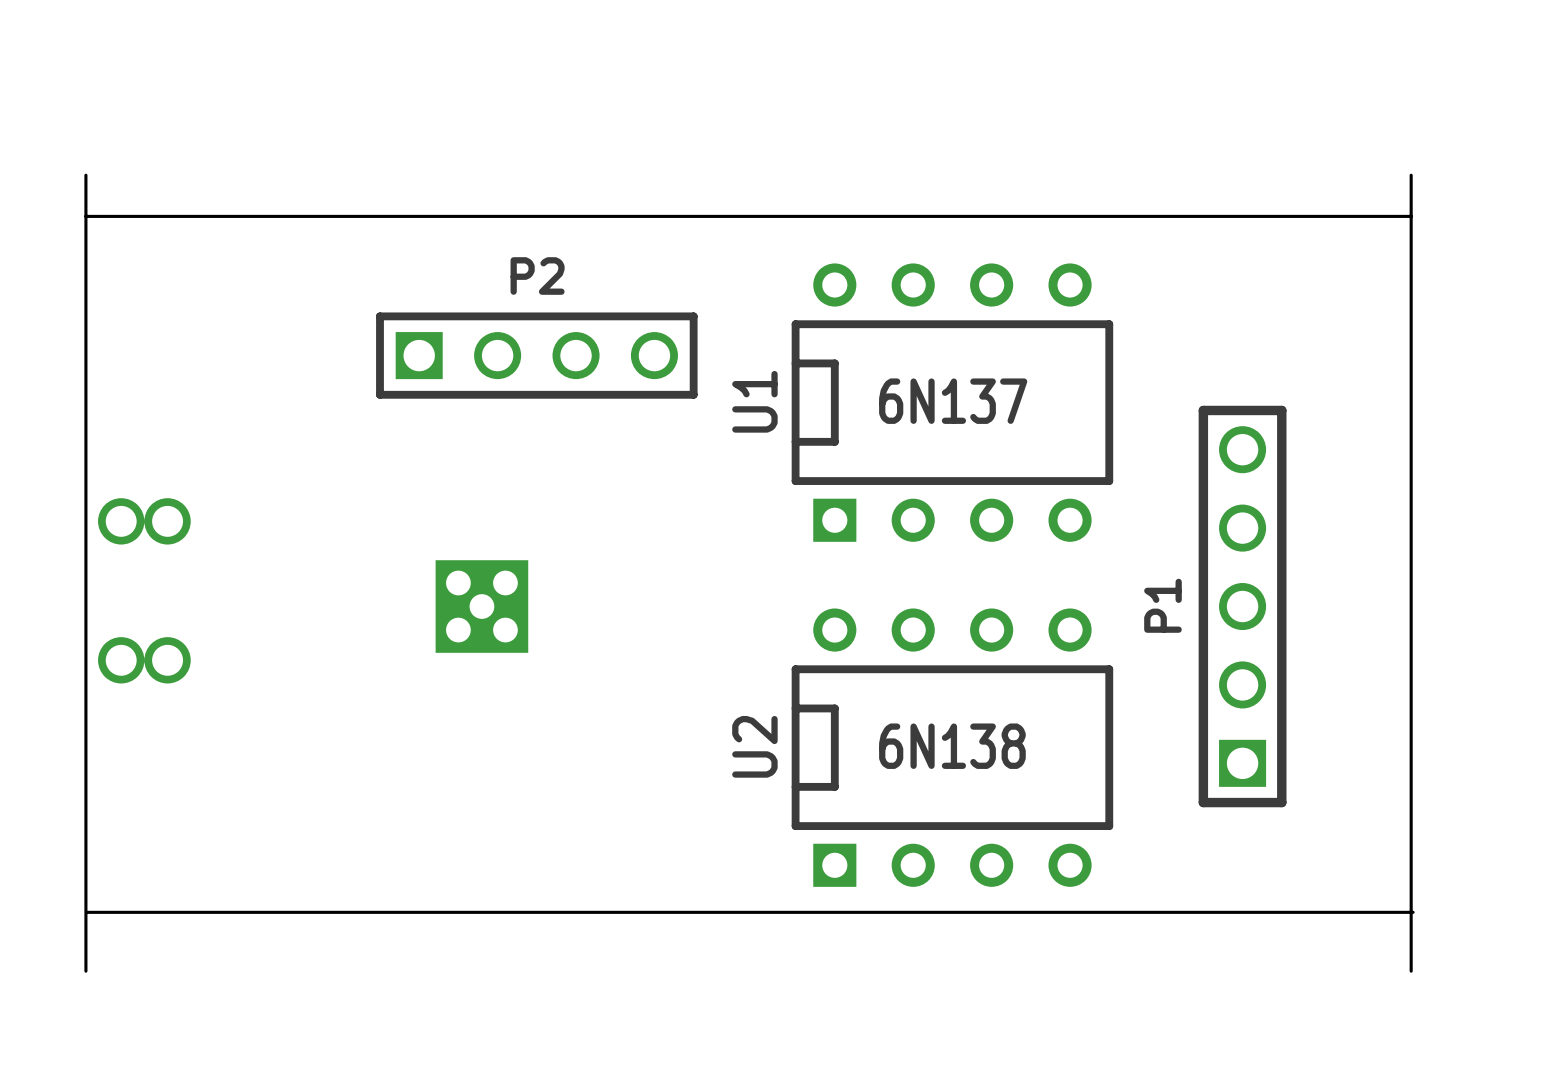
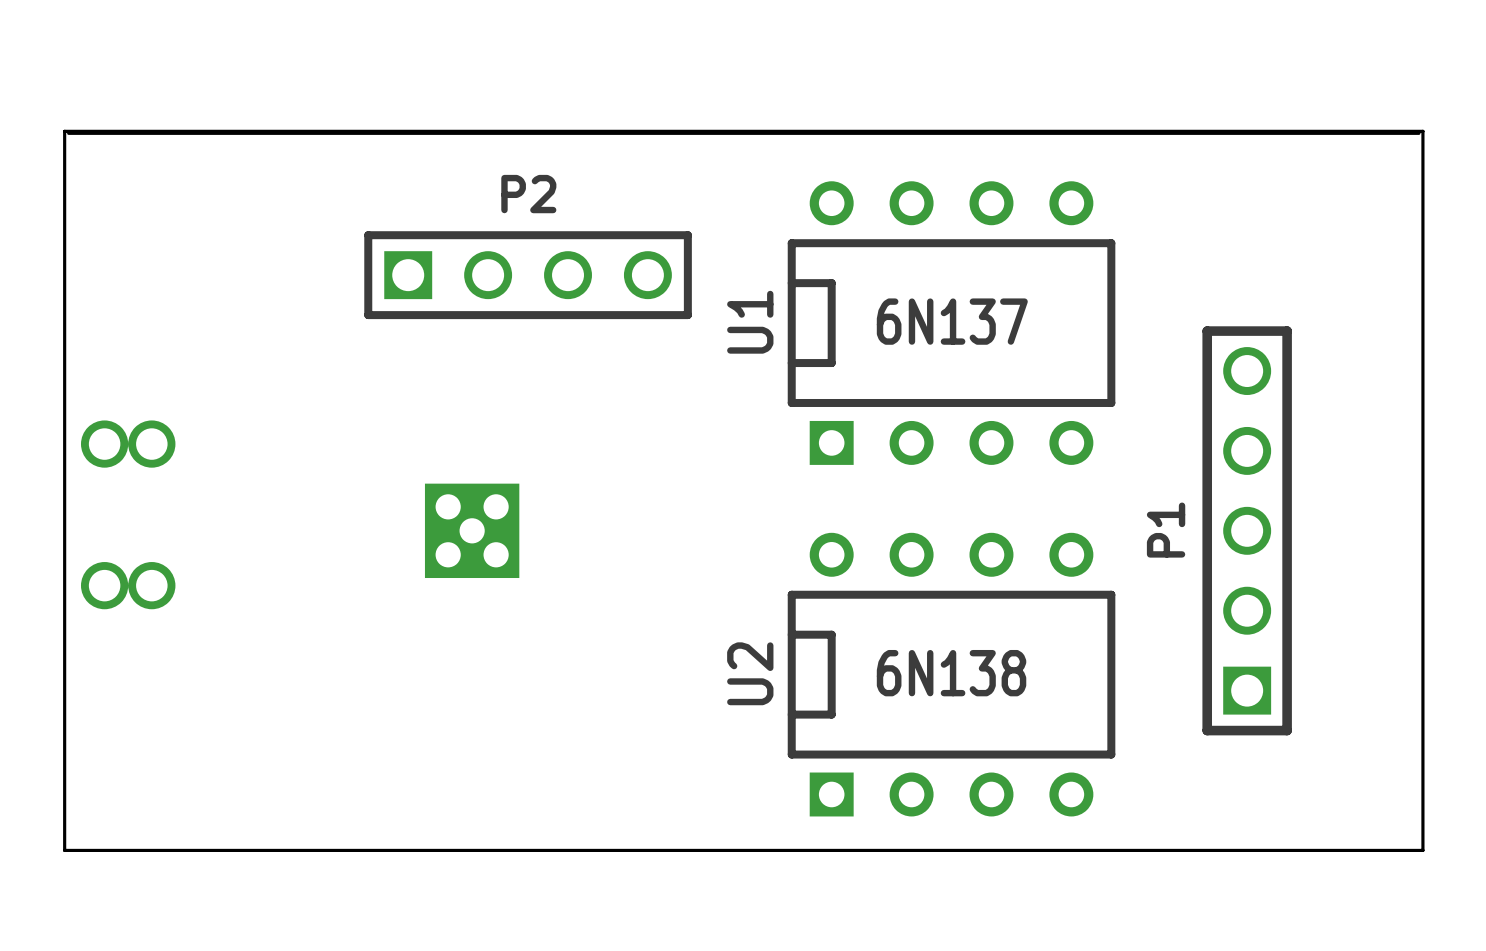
board edge: (85, 175) (85, 971) -> none
board edge: (1411, 175) (1411, 971) -> none
board edge: none -> (64, 131) (64, 850) (1422, 850) (1422, 131) (64, 131)
board edge: (87, 912) (1413, 912) -> none

